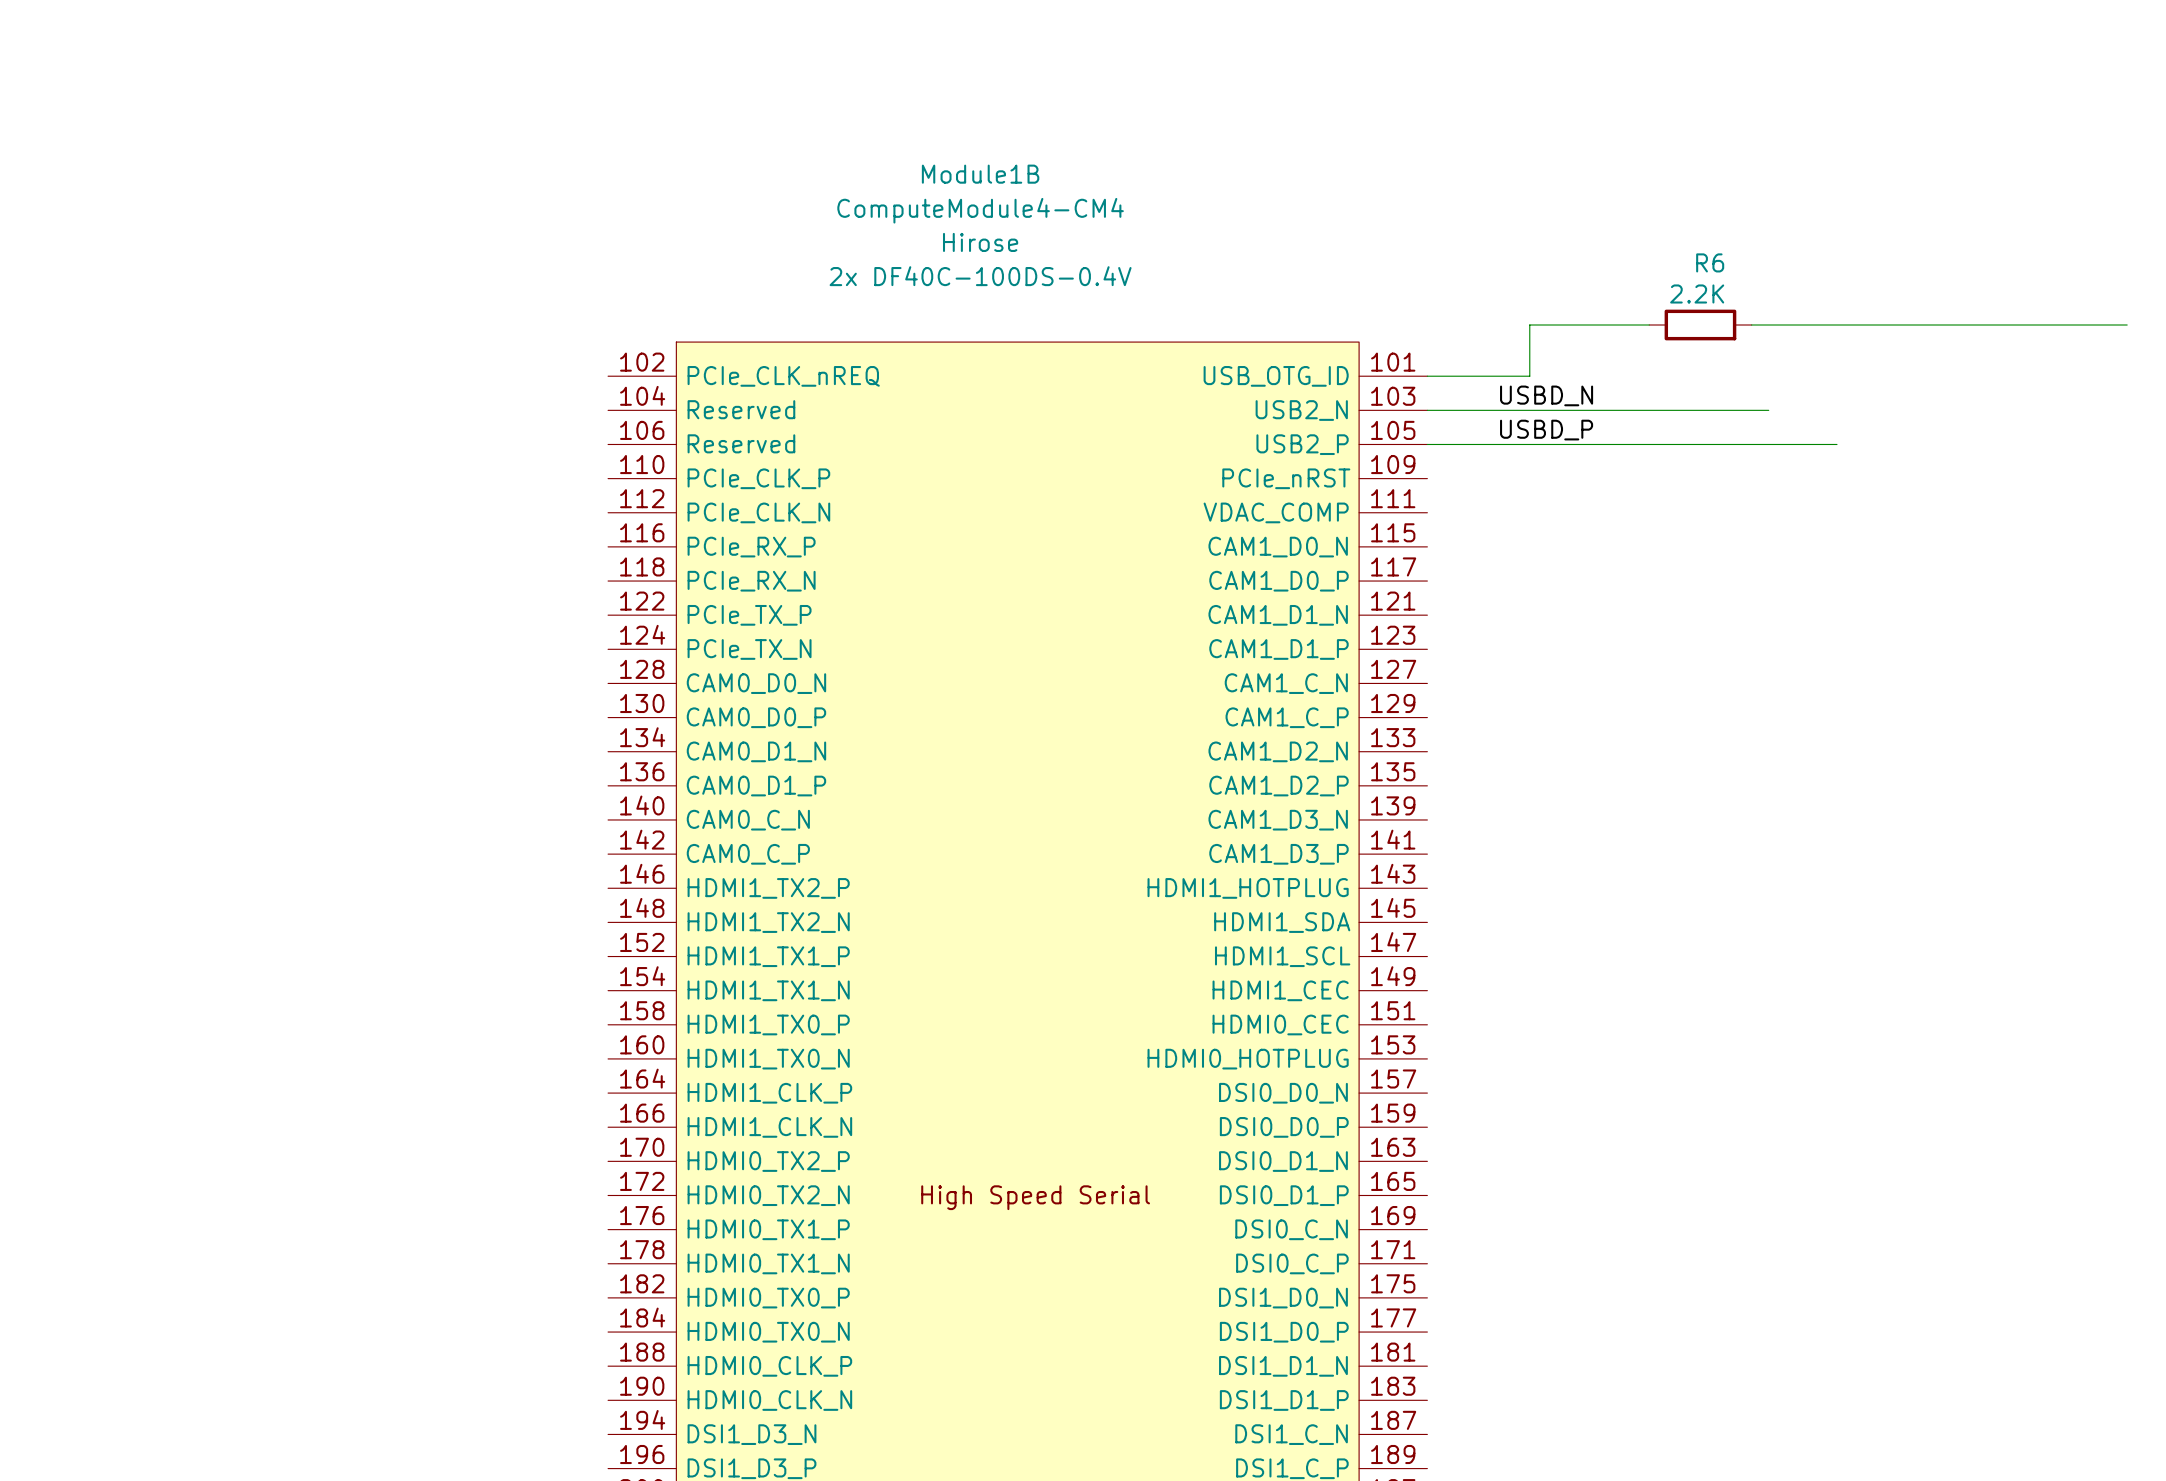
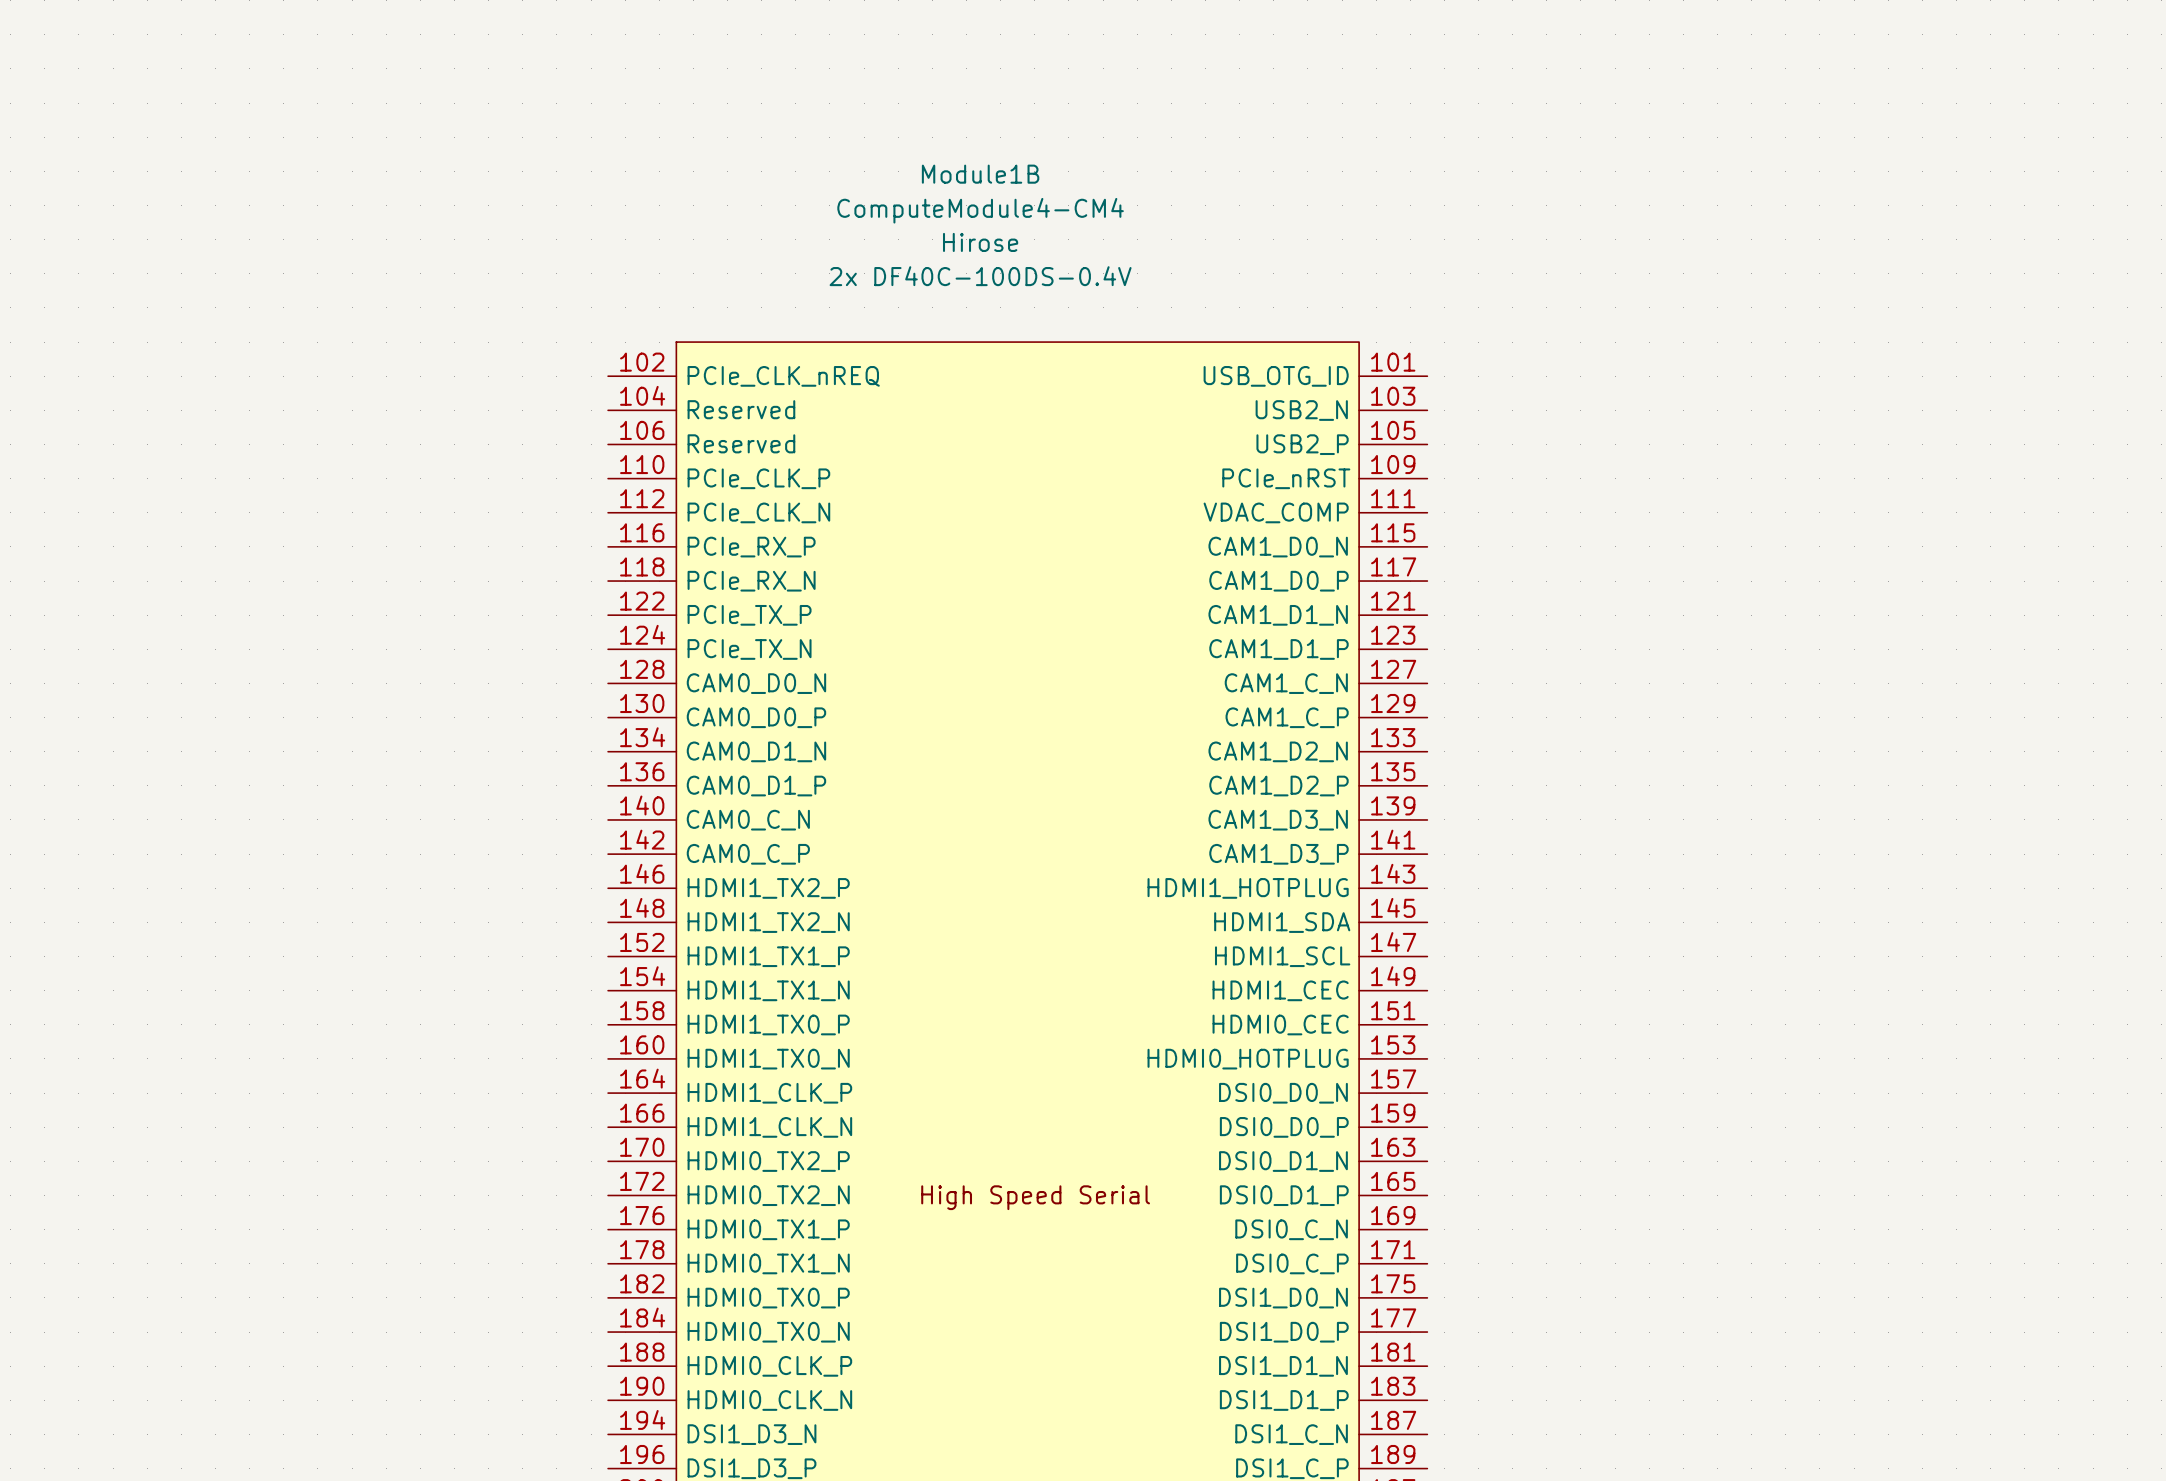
wire: (1649, 325) (1529, 325) (1529, 376) (1427, 376) -> none
R6: 2.2K (1700, 325) -> none
wire: (1751, 325) (2127, 325) -> none
label: USBD_N (1546, 395) -> none
wire: (1427, 410) (1768, 410) -> none
label: USBD_P (1546, 430) -> none
wire: (1427, 444) (1837, 444) -> none

